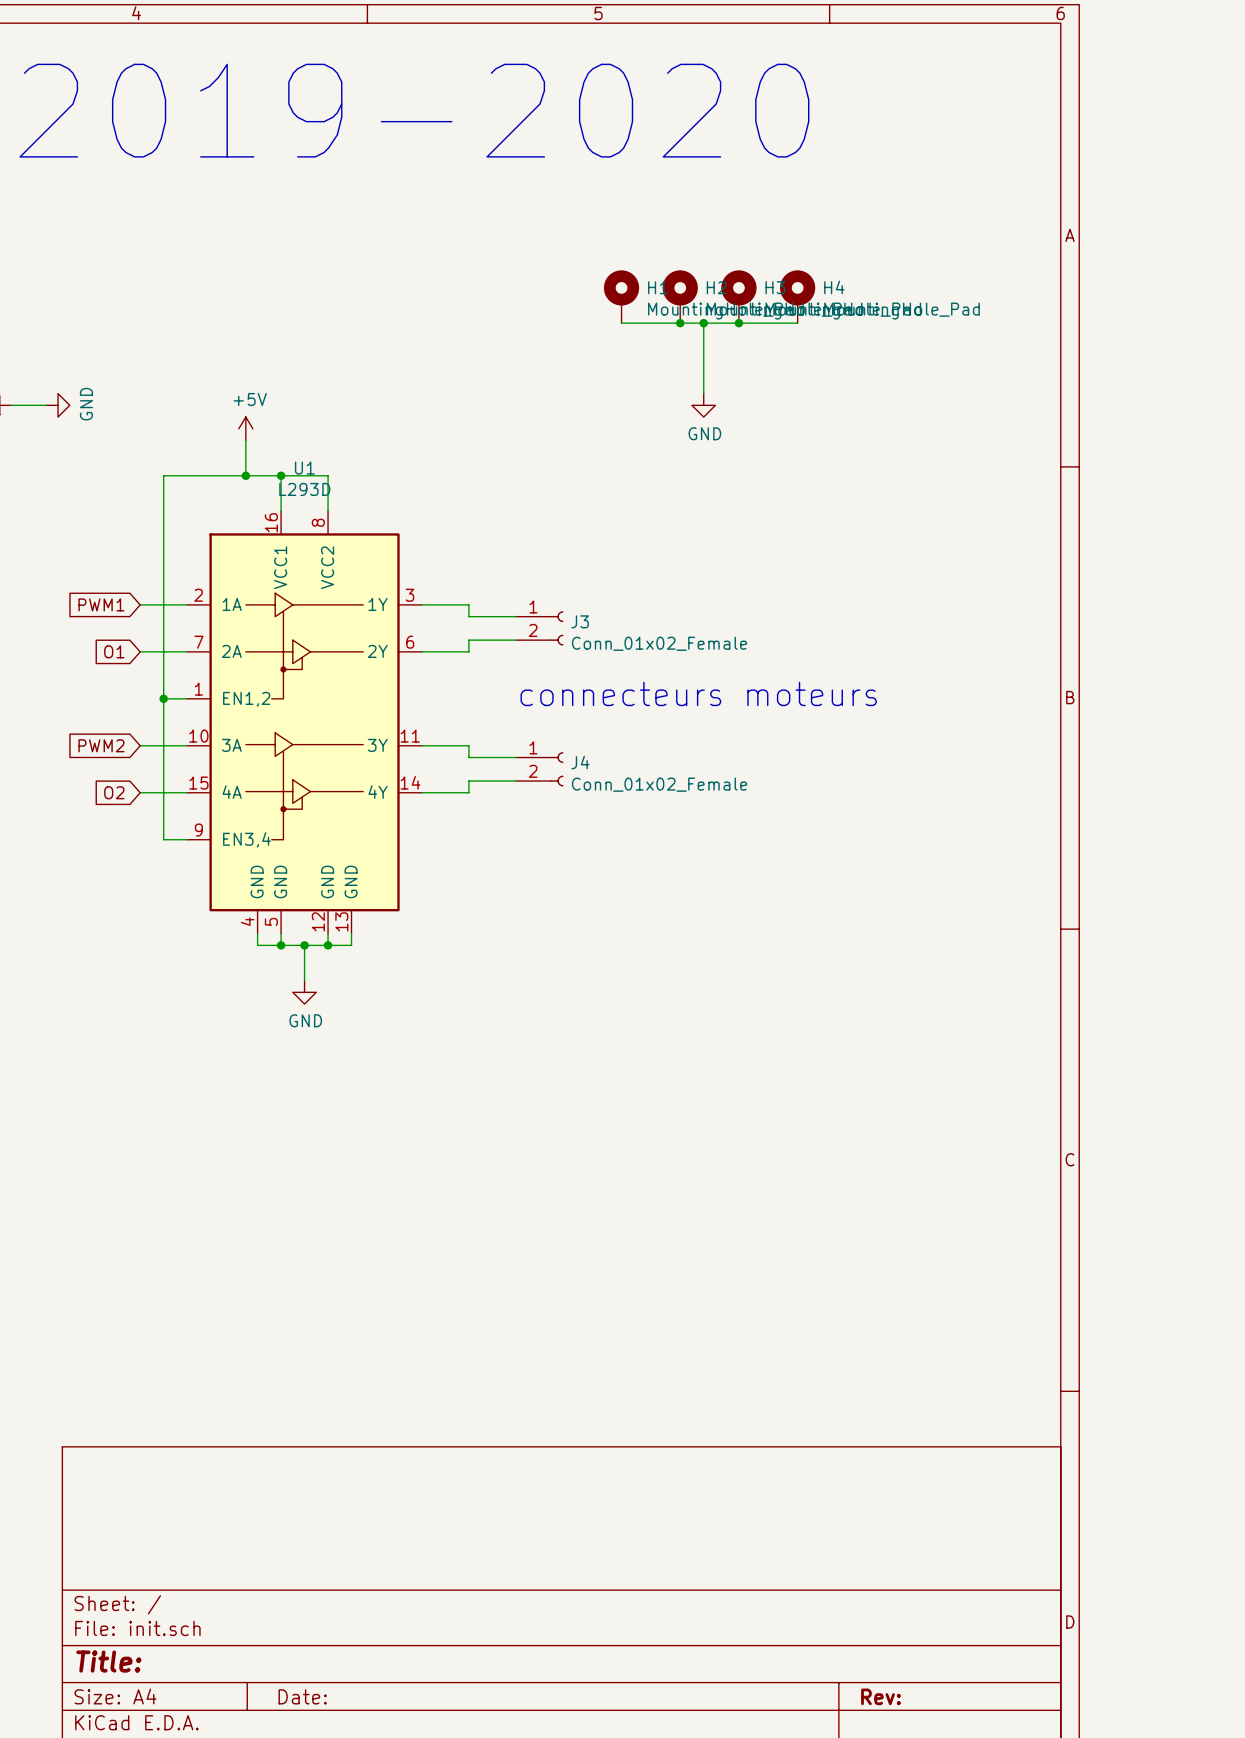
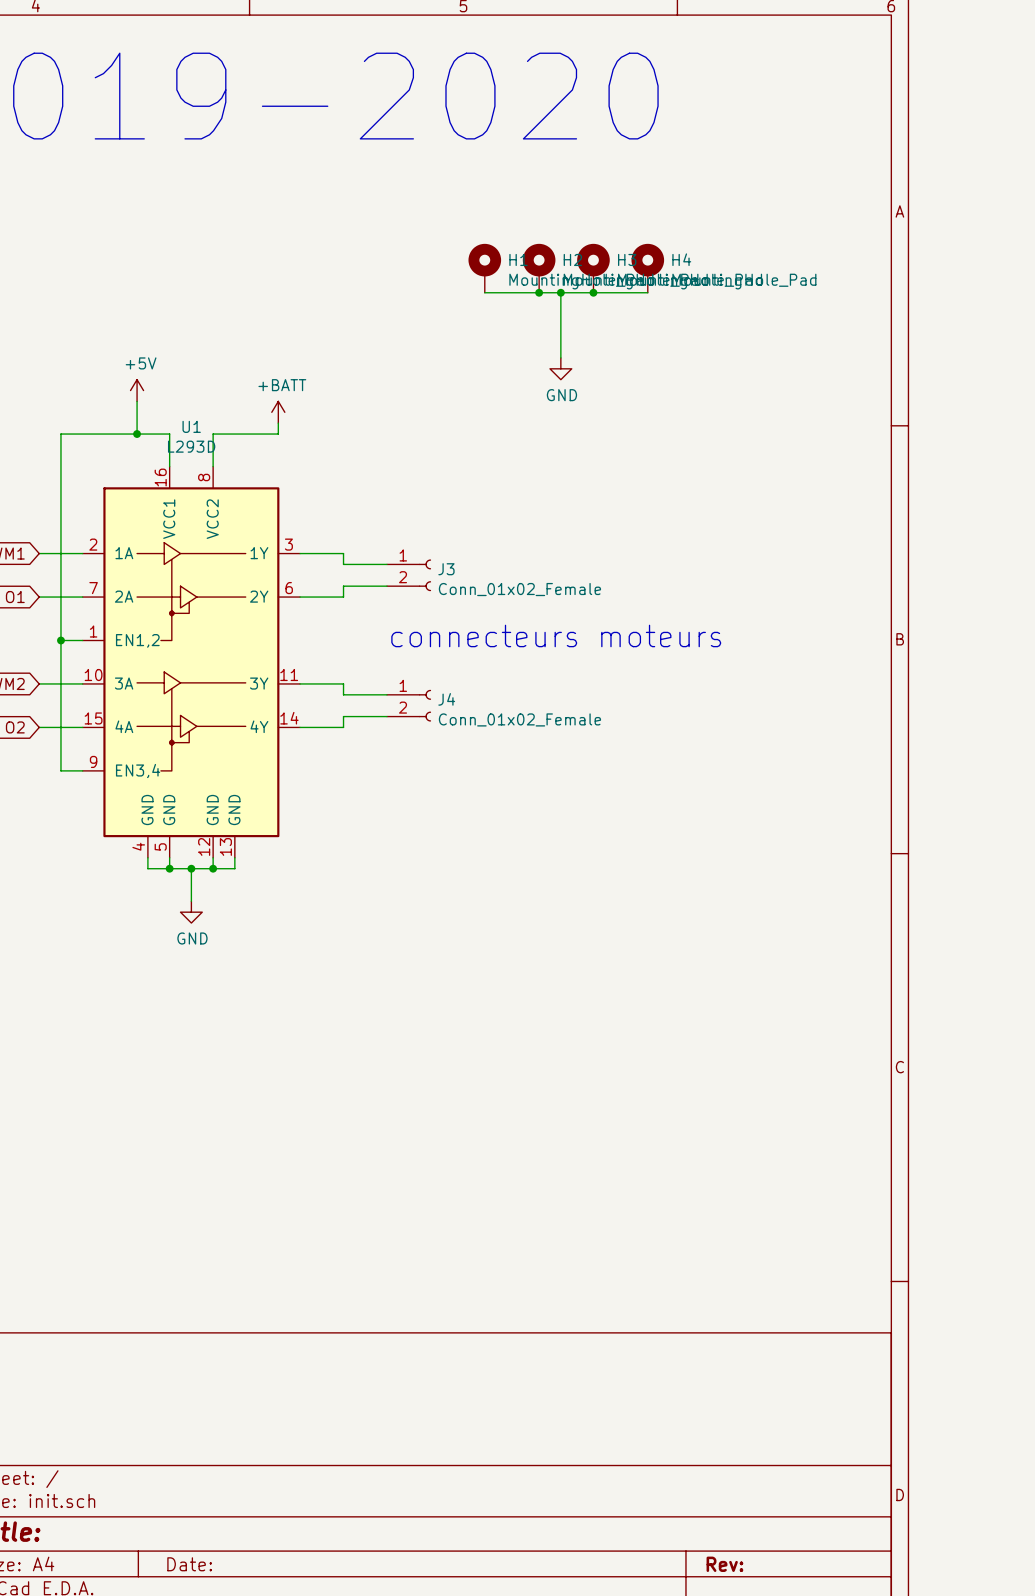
power symbol: none -> +BATT (278, 412)
wire: (281, 475) (328, 475) -> (278, 423) (278, 434) (213, 434)
junction: (281, 475) -> none

